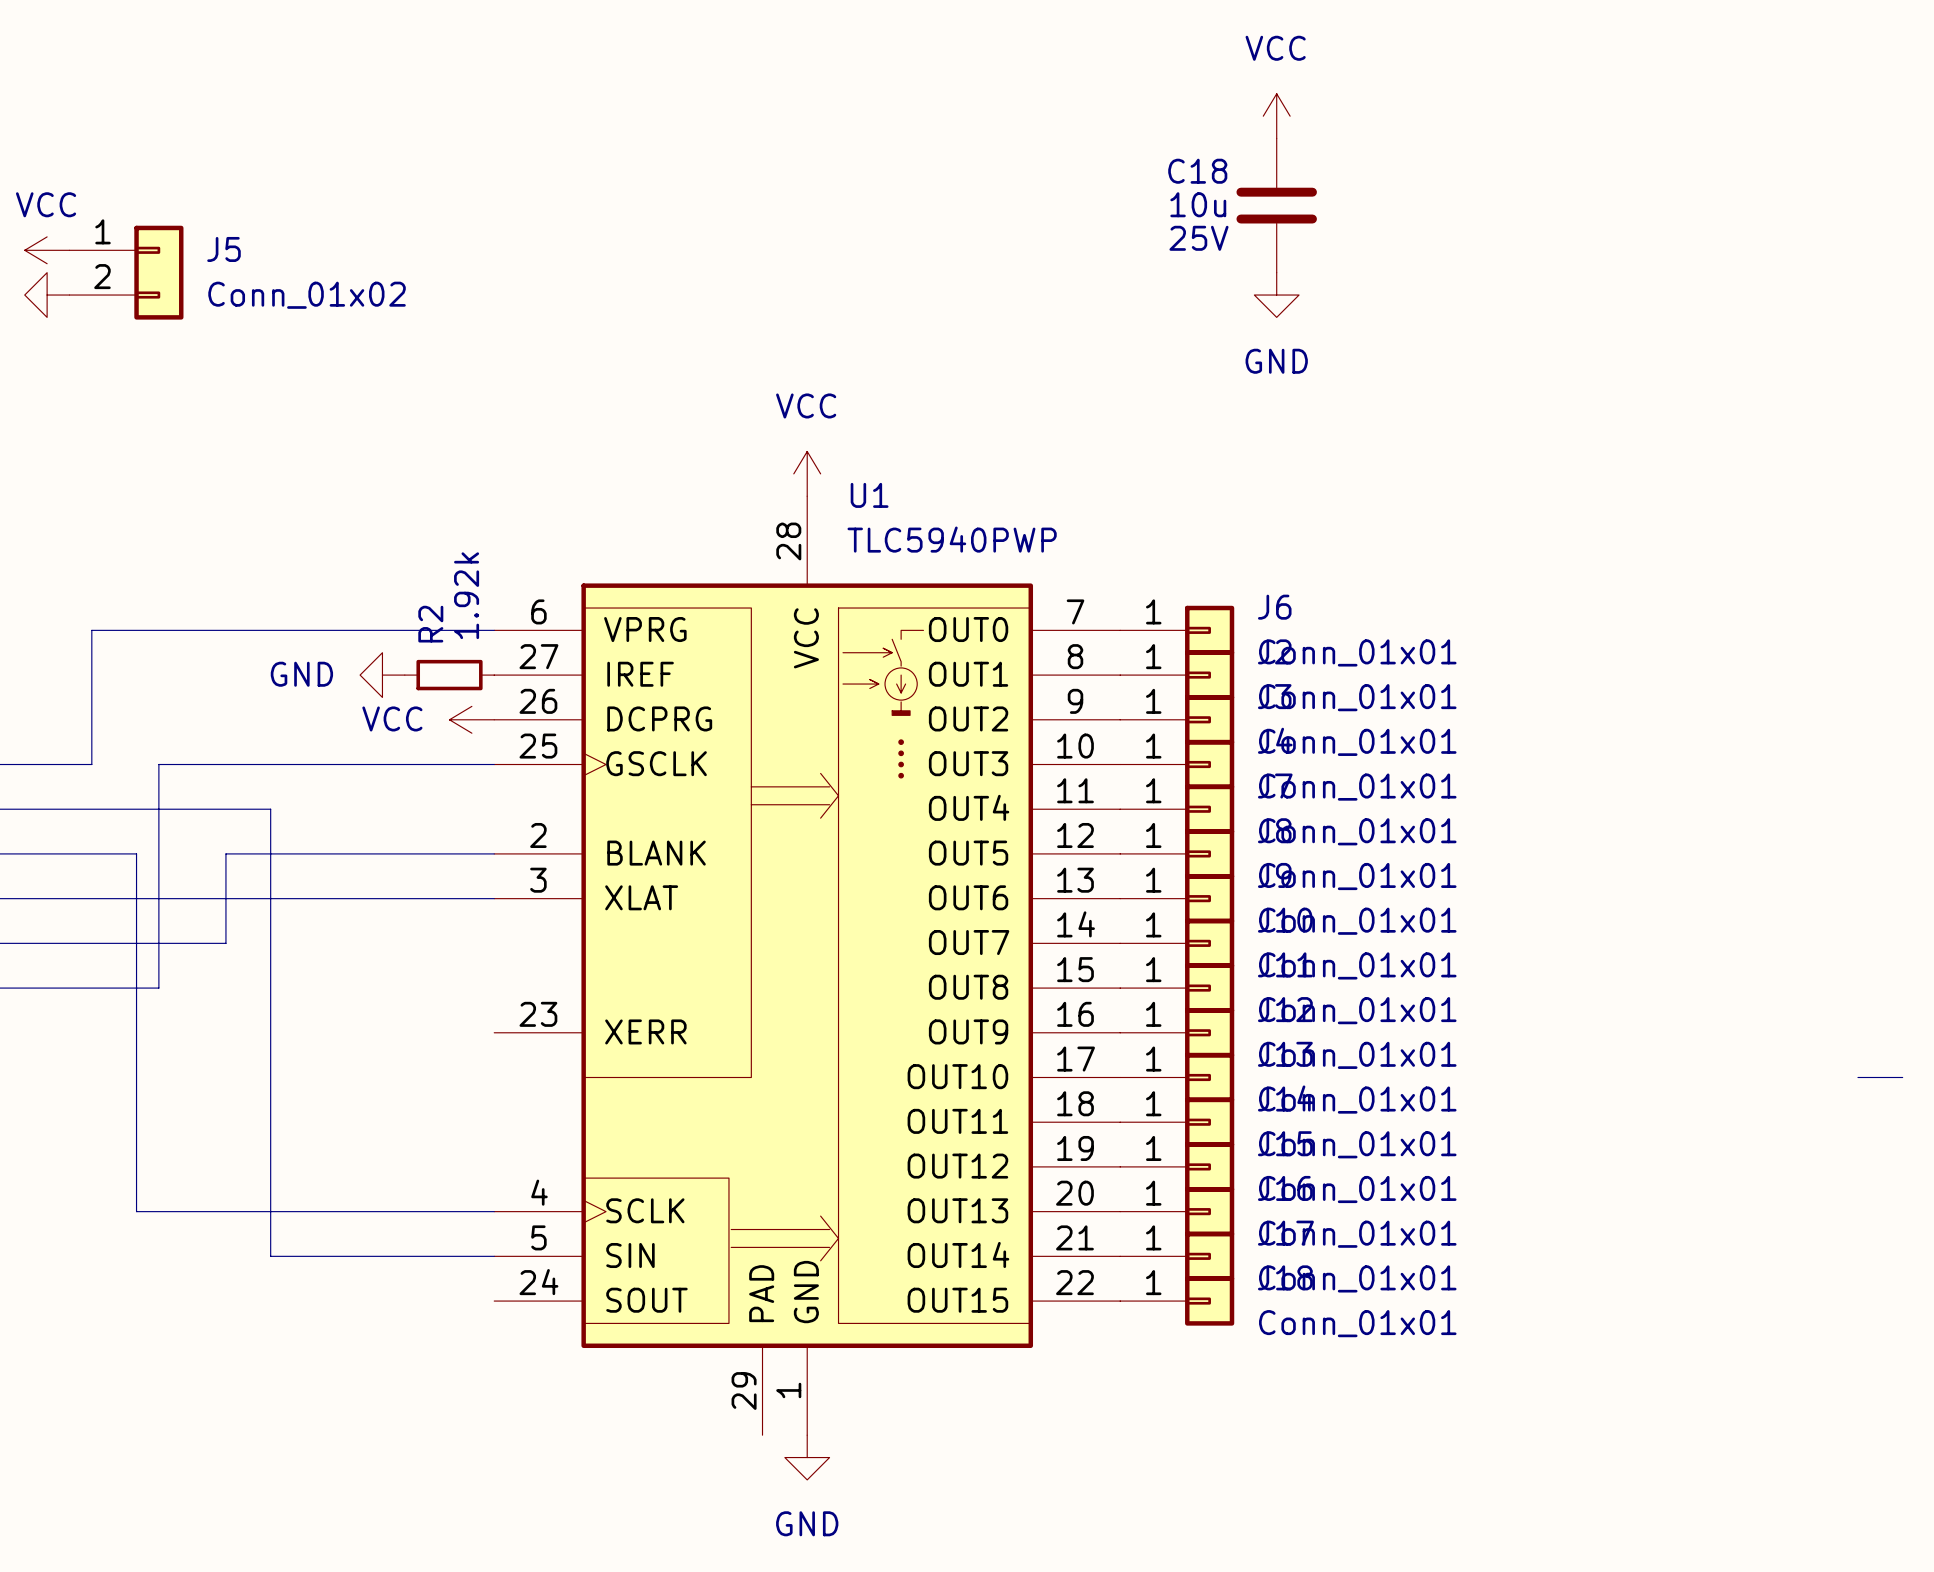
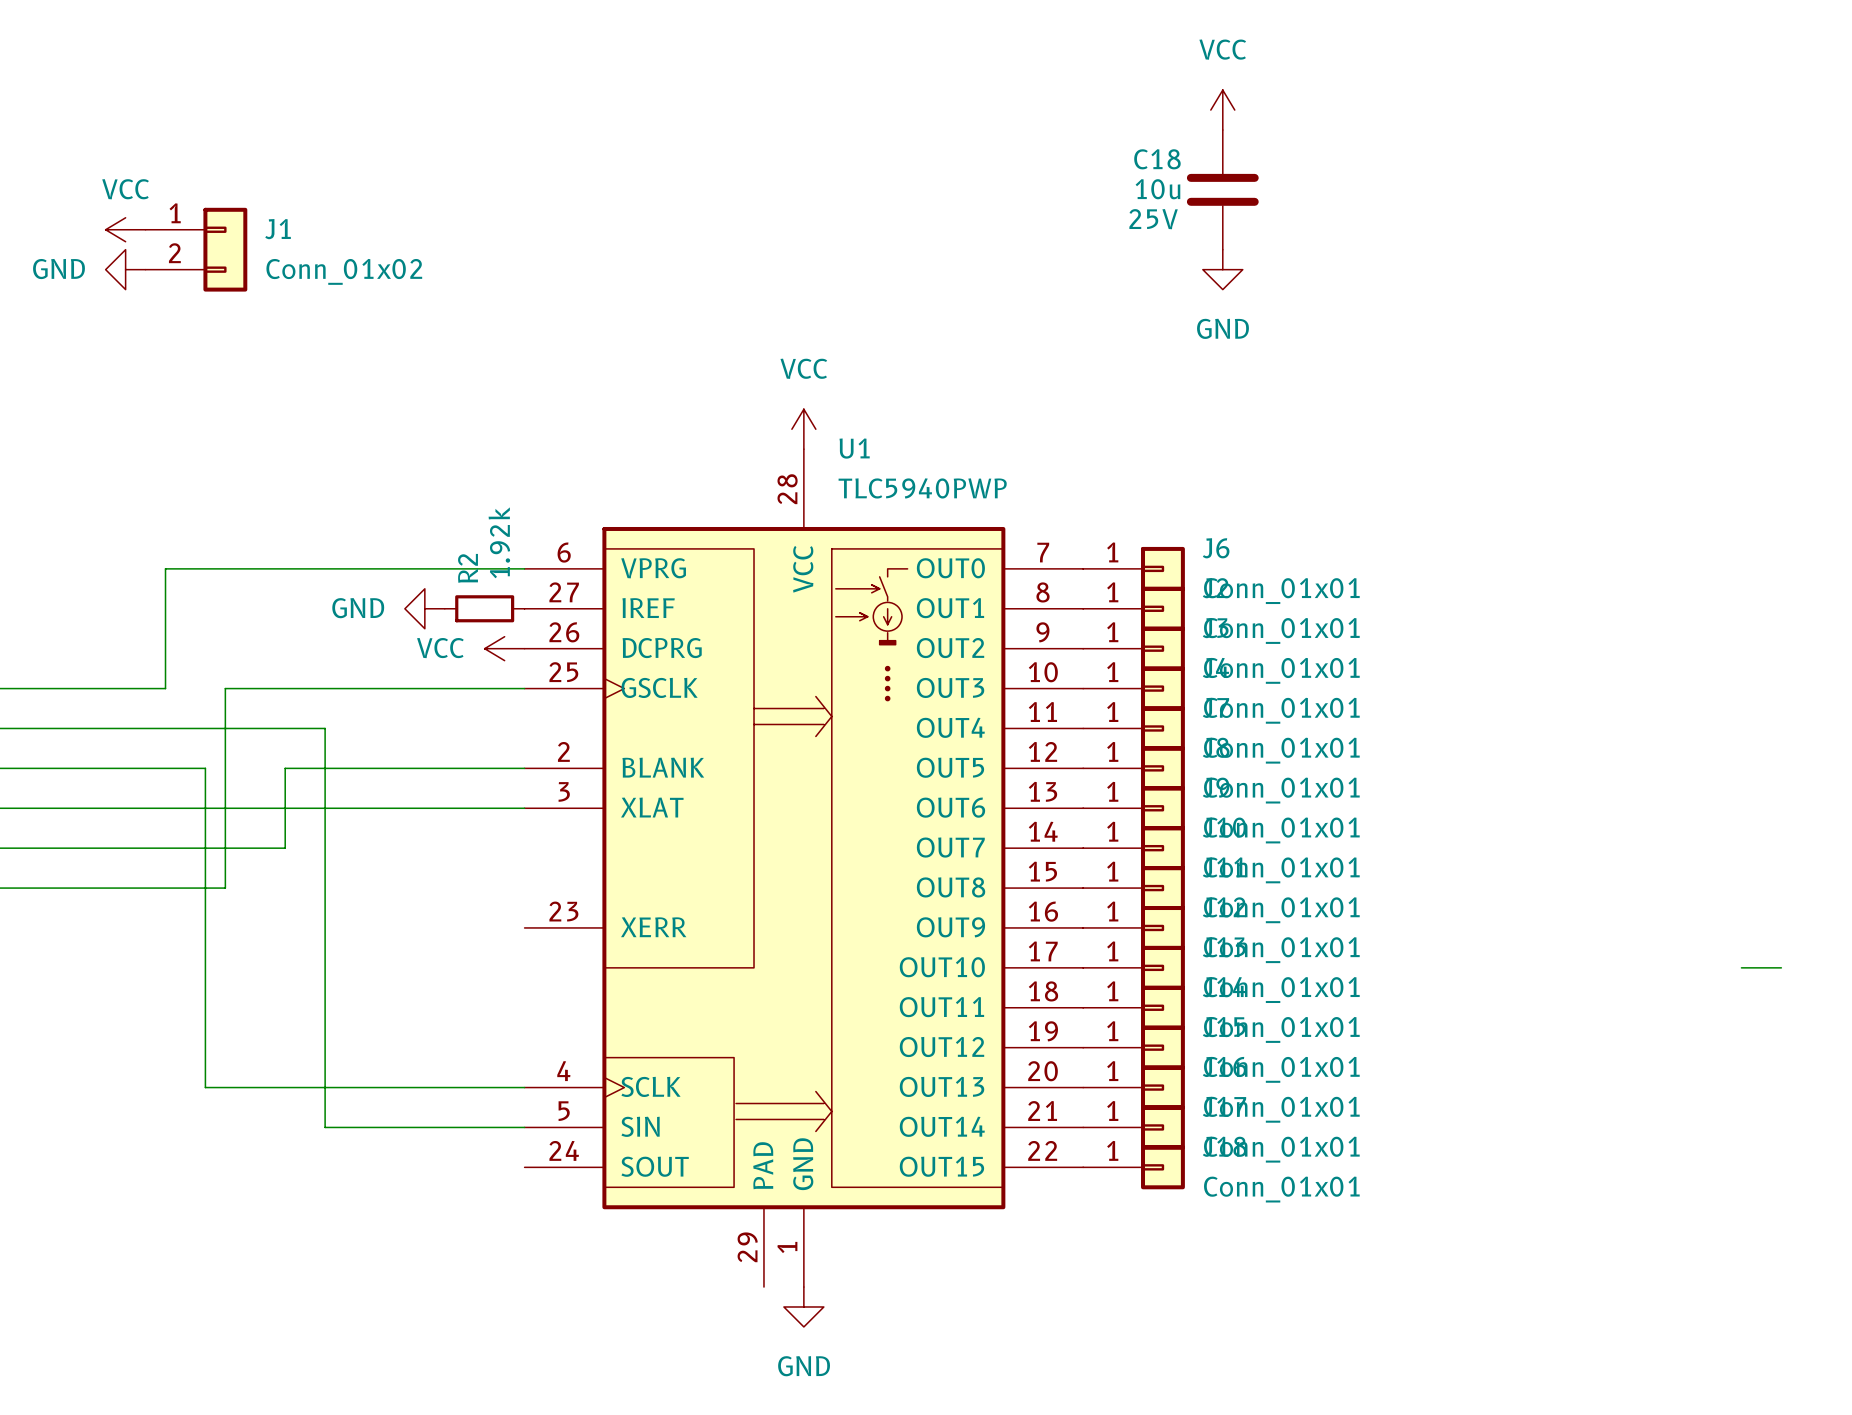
J5 name: J5 (224, 249) -> J1 (278, 229)

